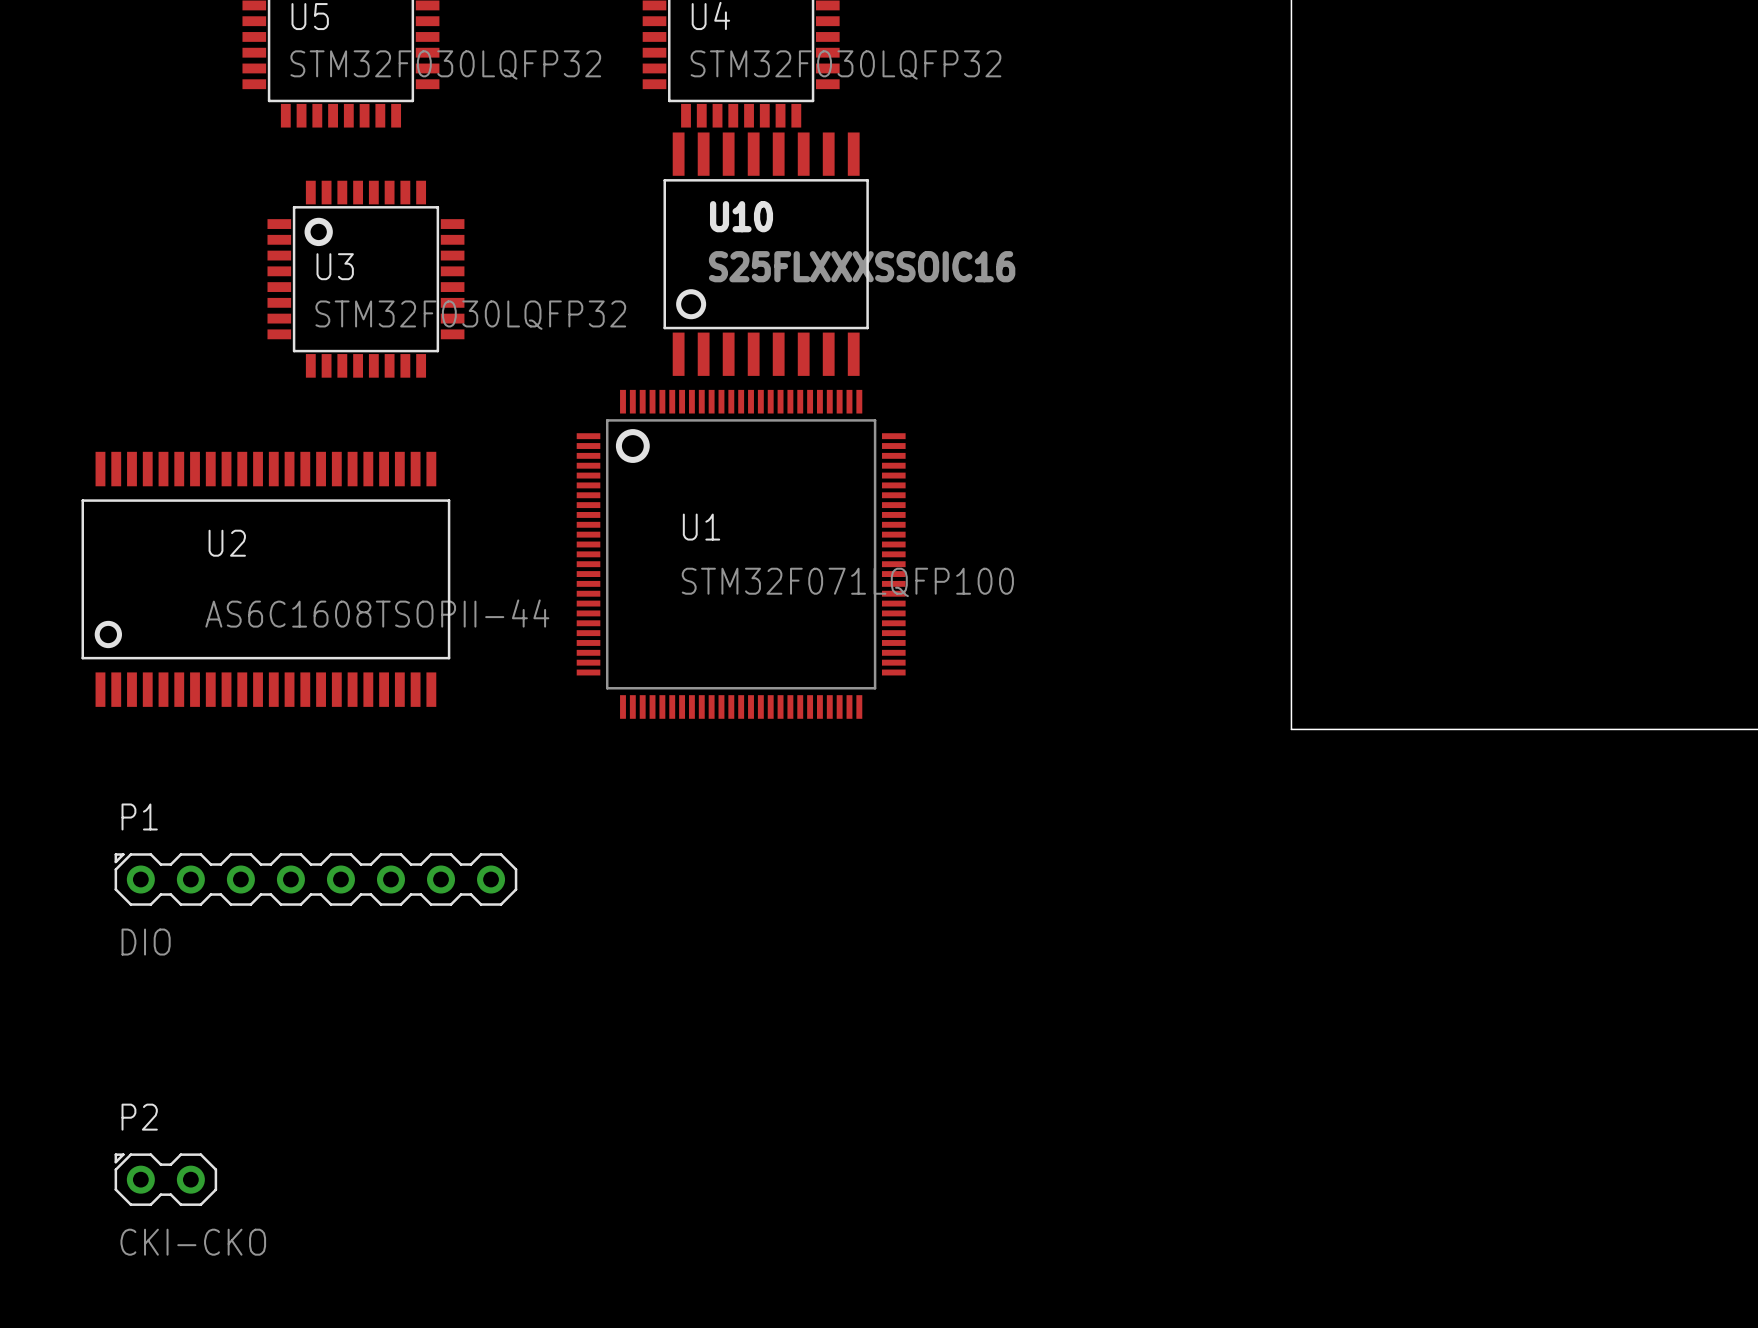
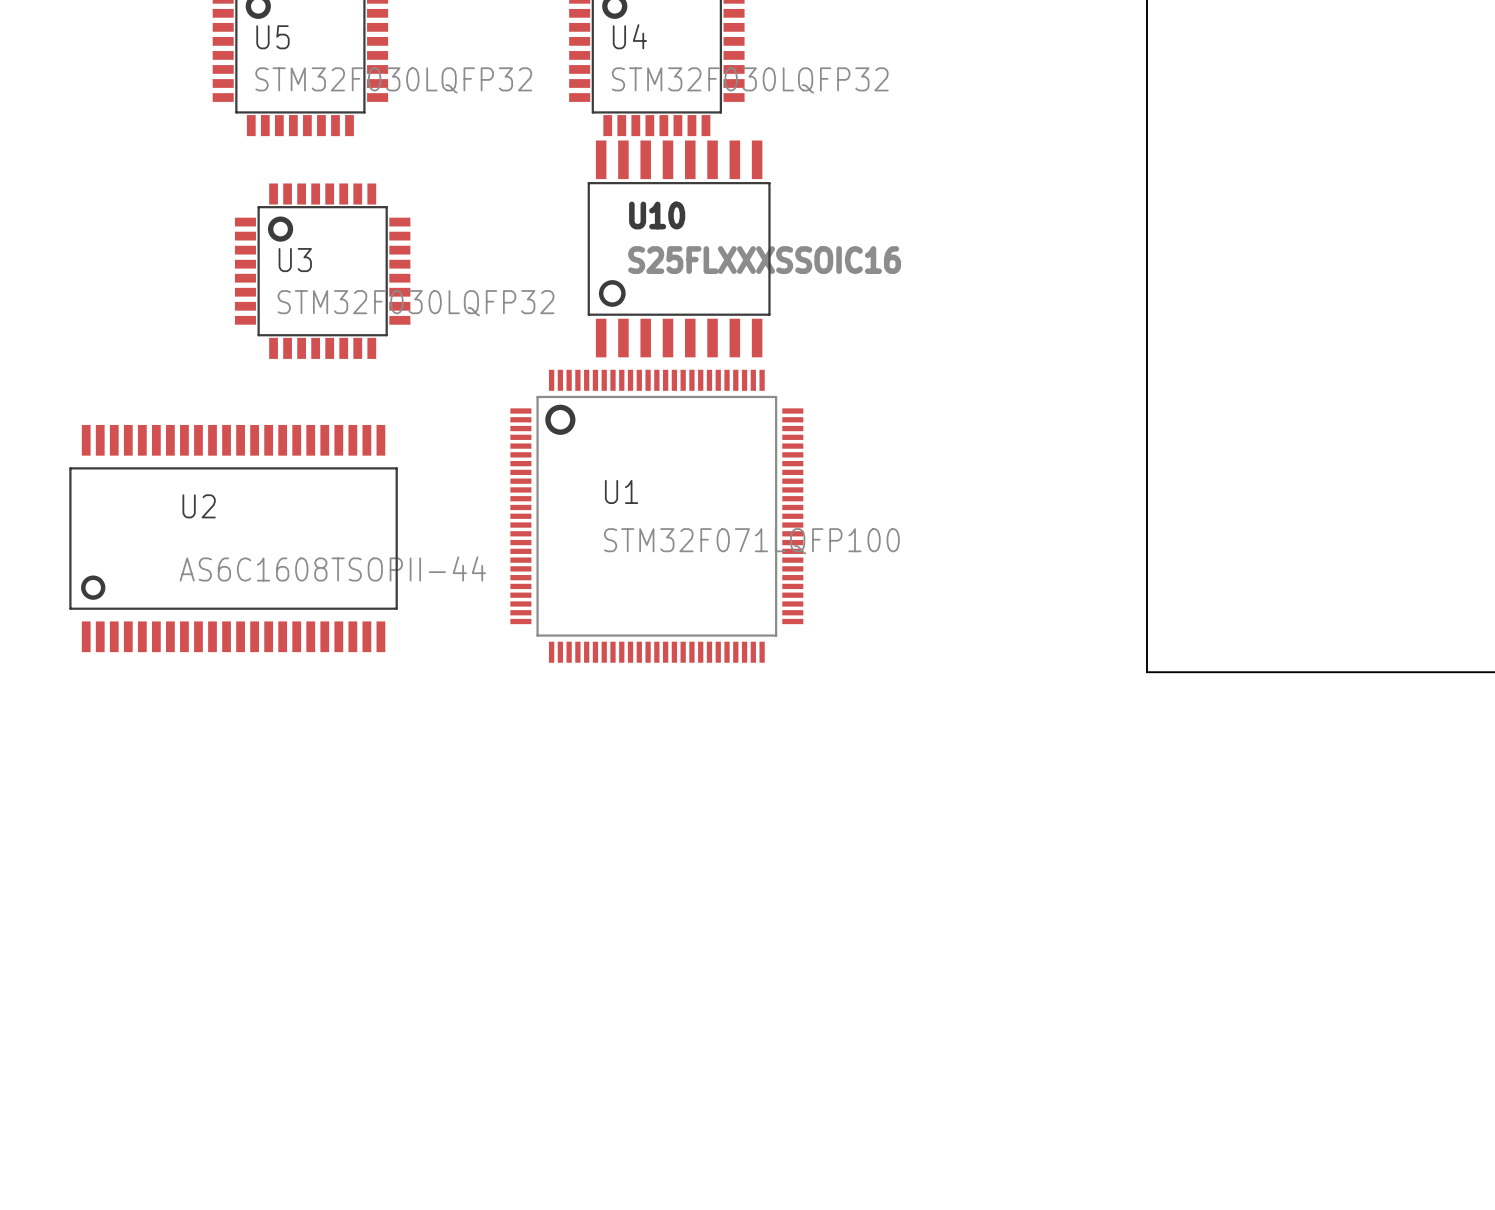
P1: DIO (315, 879) -> none
P2: CKI-CKO (165, 1179) -> none

